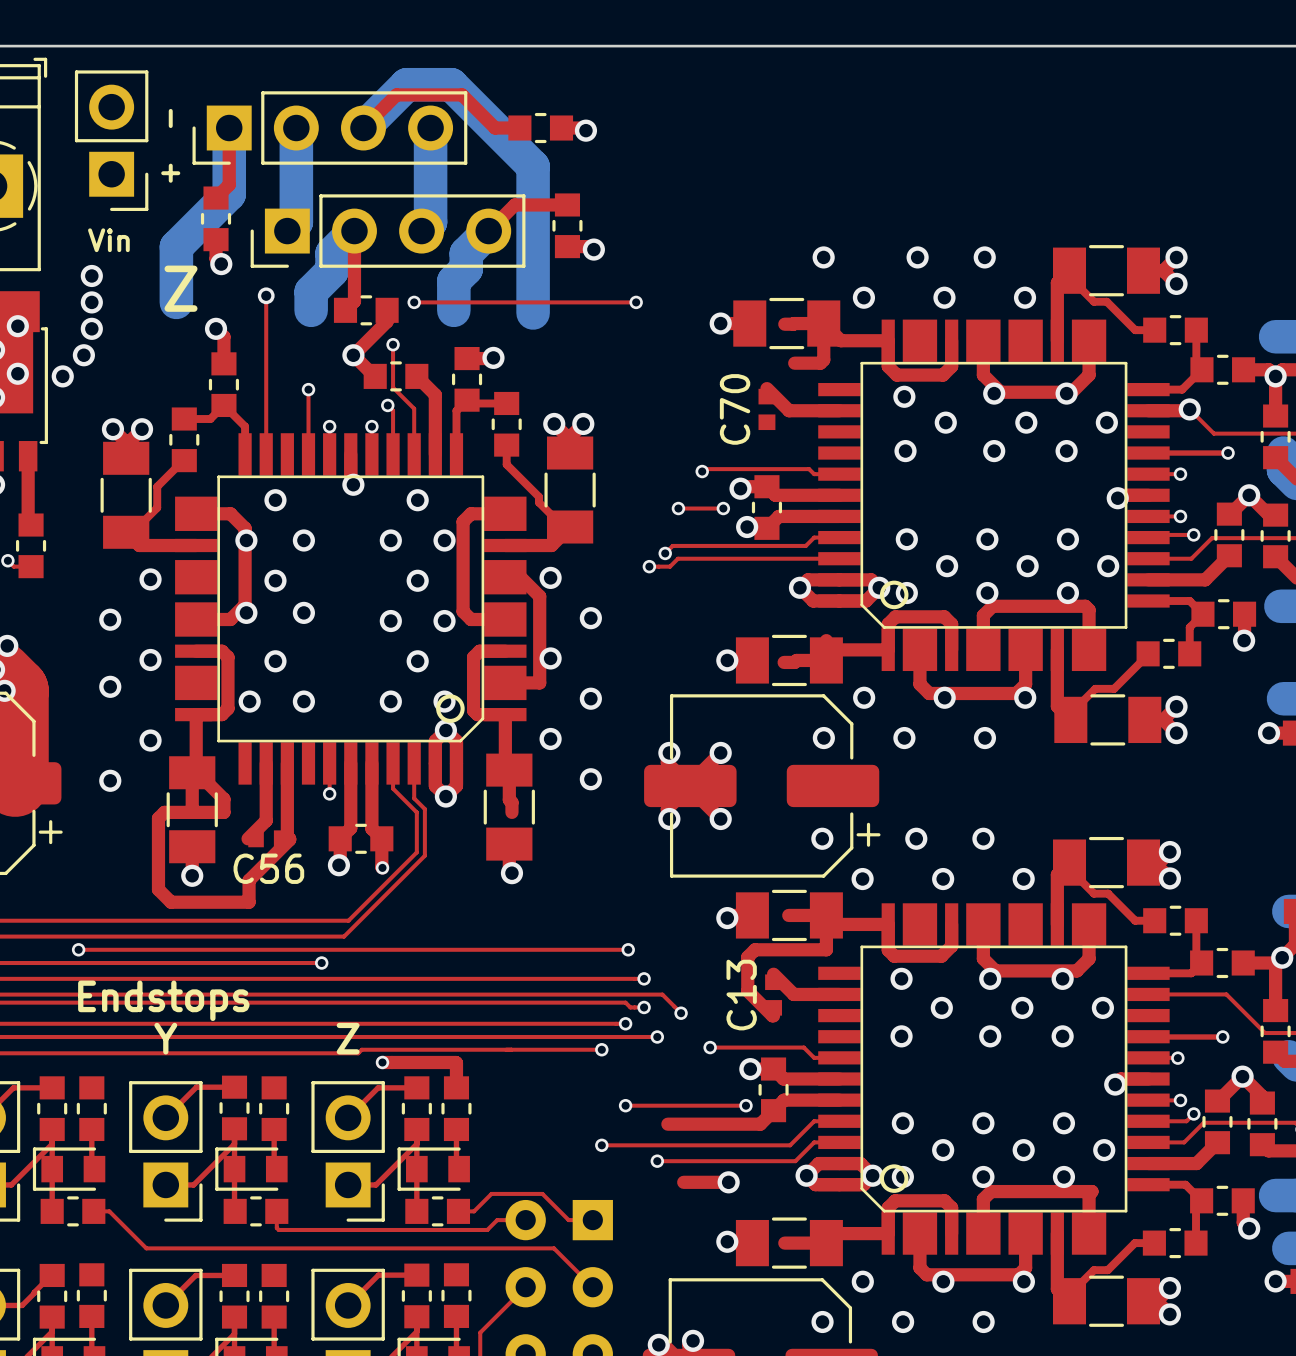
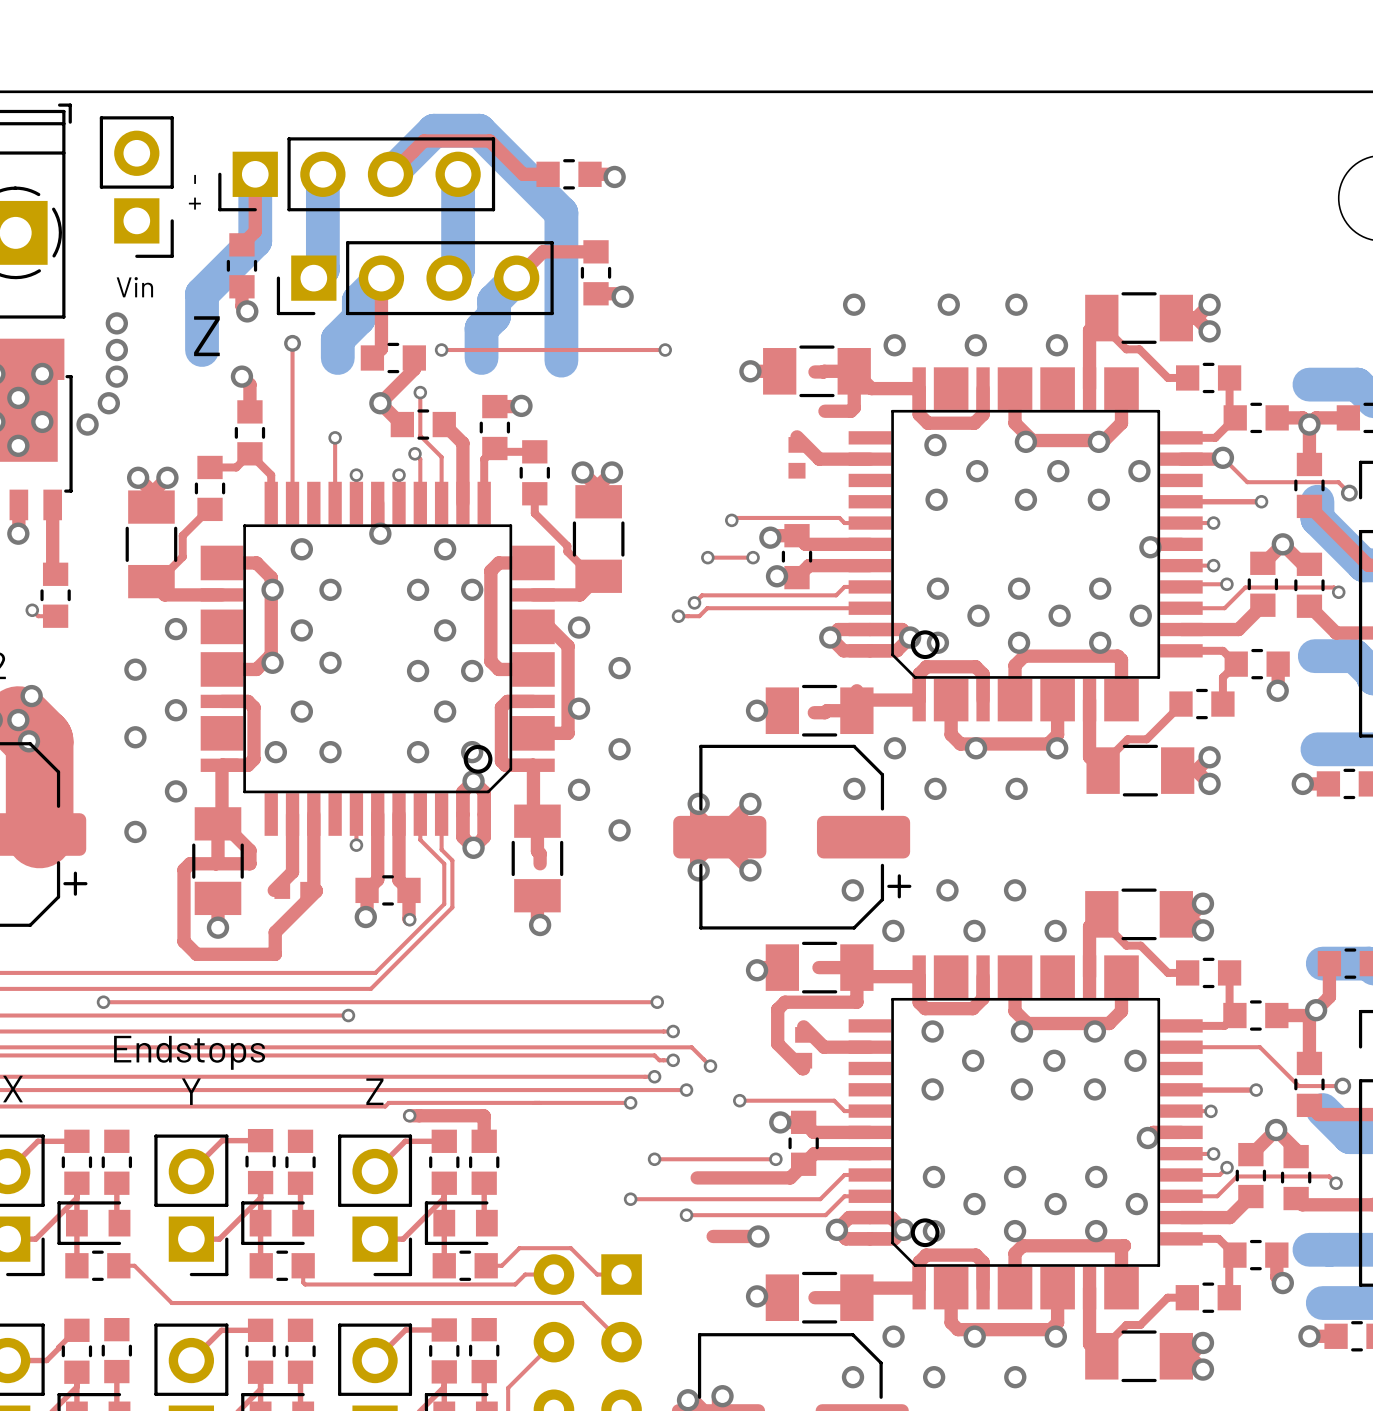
C70 name: C70 (735, 409) -> none
C56 name: C56 (268, 868) -> none
C13 name: C13 (741, 995) -> none

